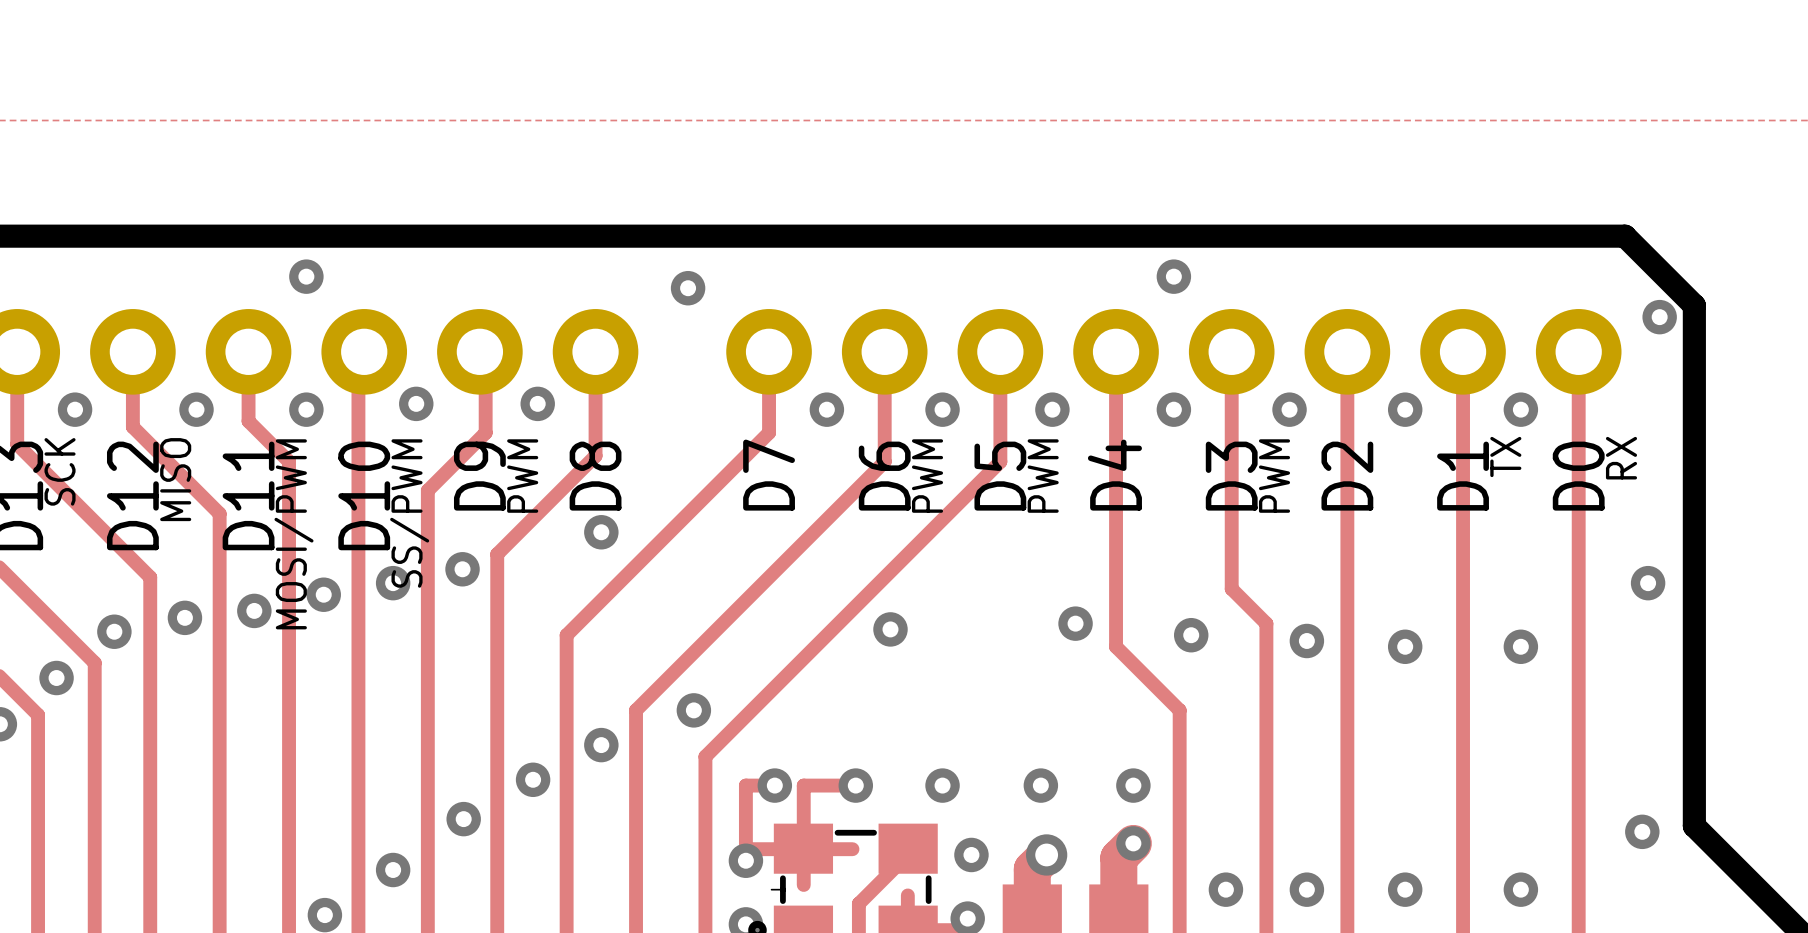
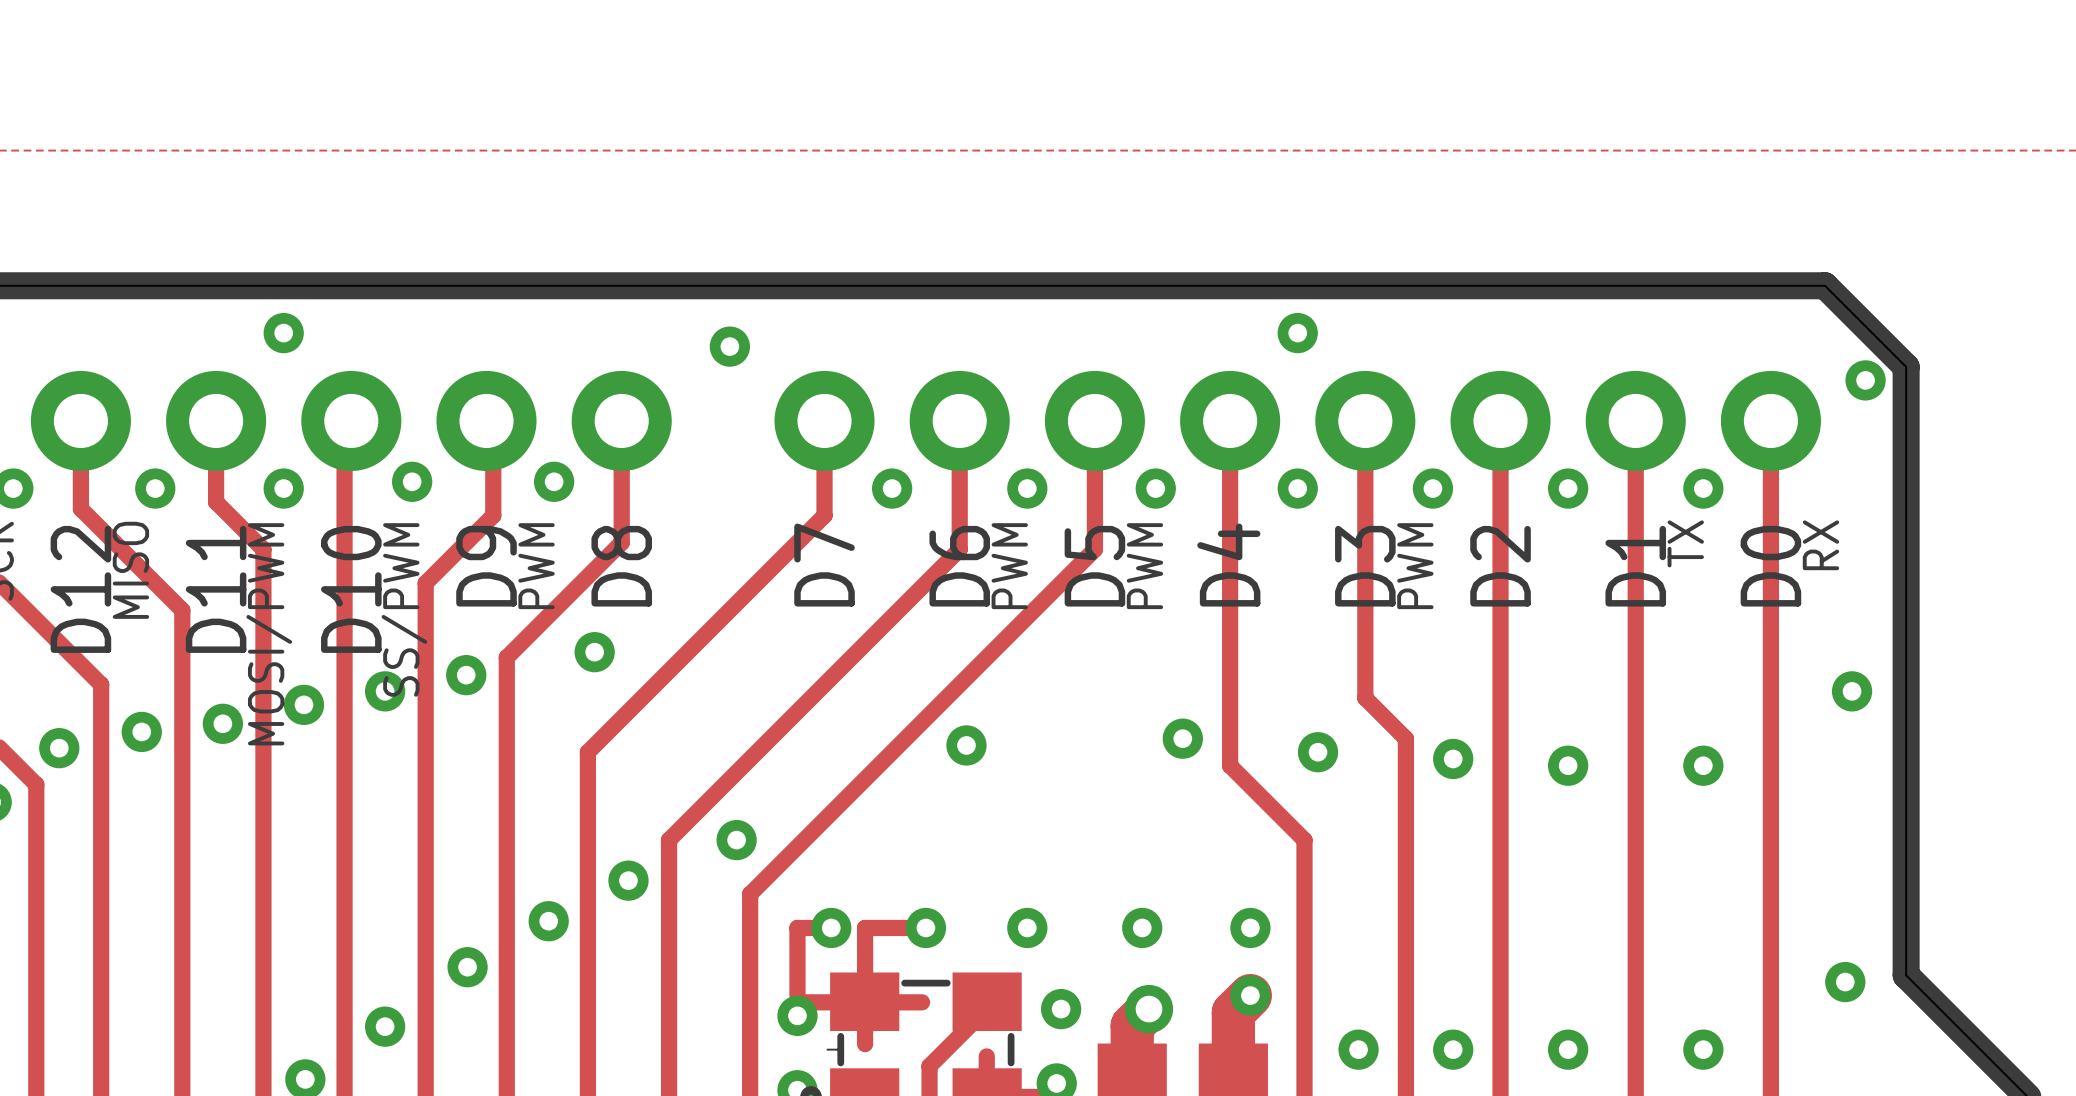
via position: (601, 532) -> (594, 652)

